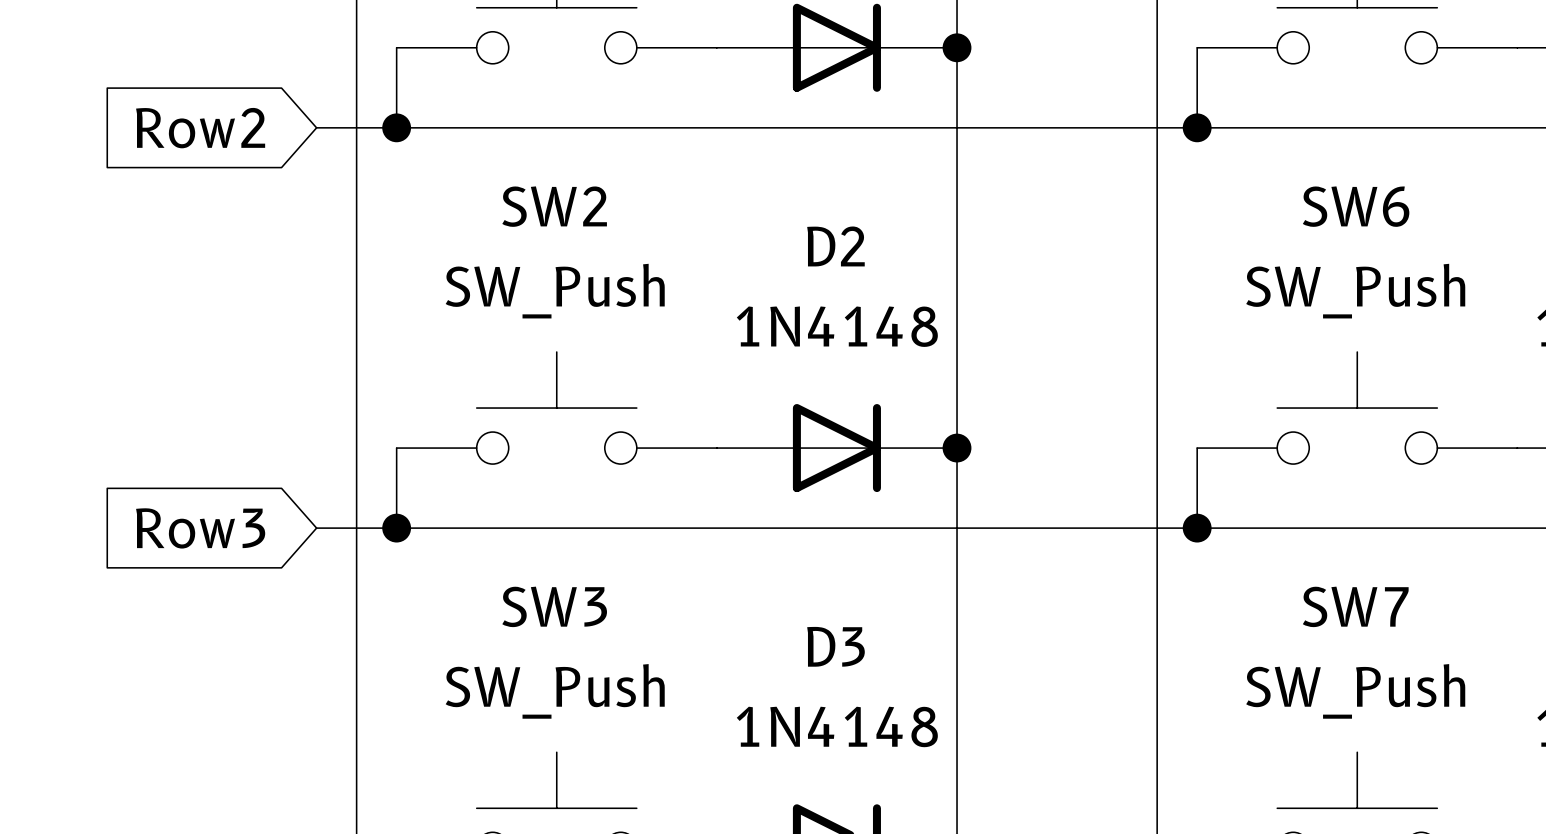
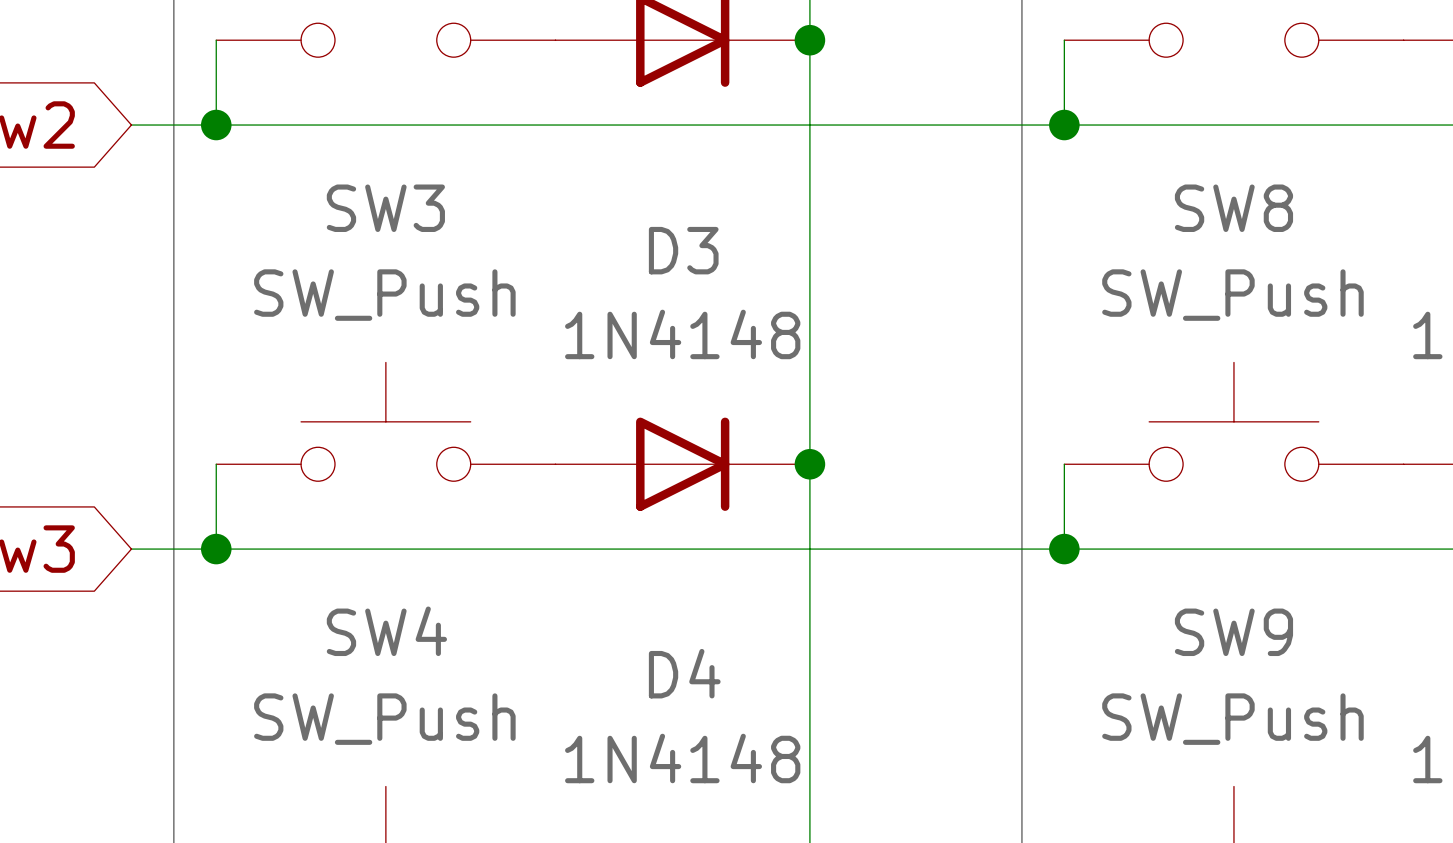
SW2 name: SW2 (554, 206) -> SW3 (385, 208)
SW6 name: SW6 (1356, 206) -> SW8 (1233, 208)
D2 name: D2 (835, 246) -> D3 (683, 250)
SW3 name: SW3 (554, 606) -> SW4 (386, 631)
SW7 name: SW7 (1355, 606) -> SW9 (1233, 632)
D3 name: D3 (835, 646) -> D4 (684, 673)

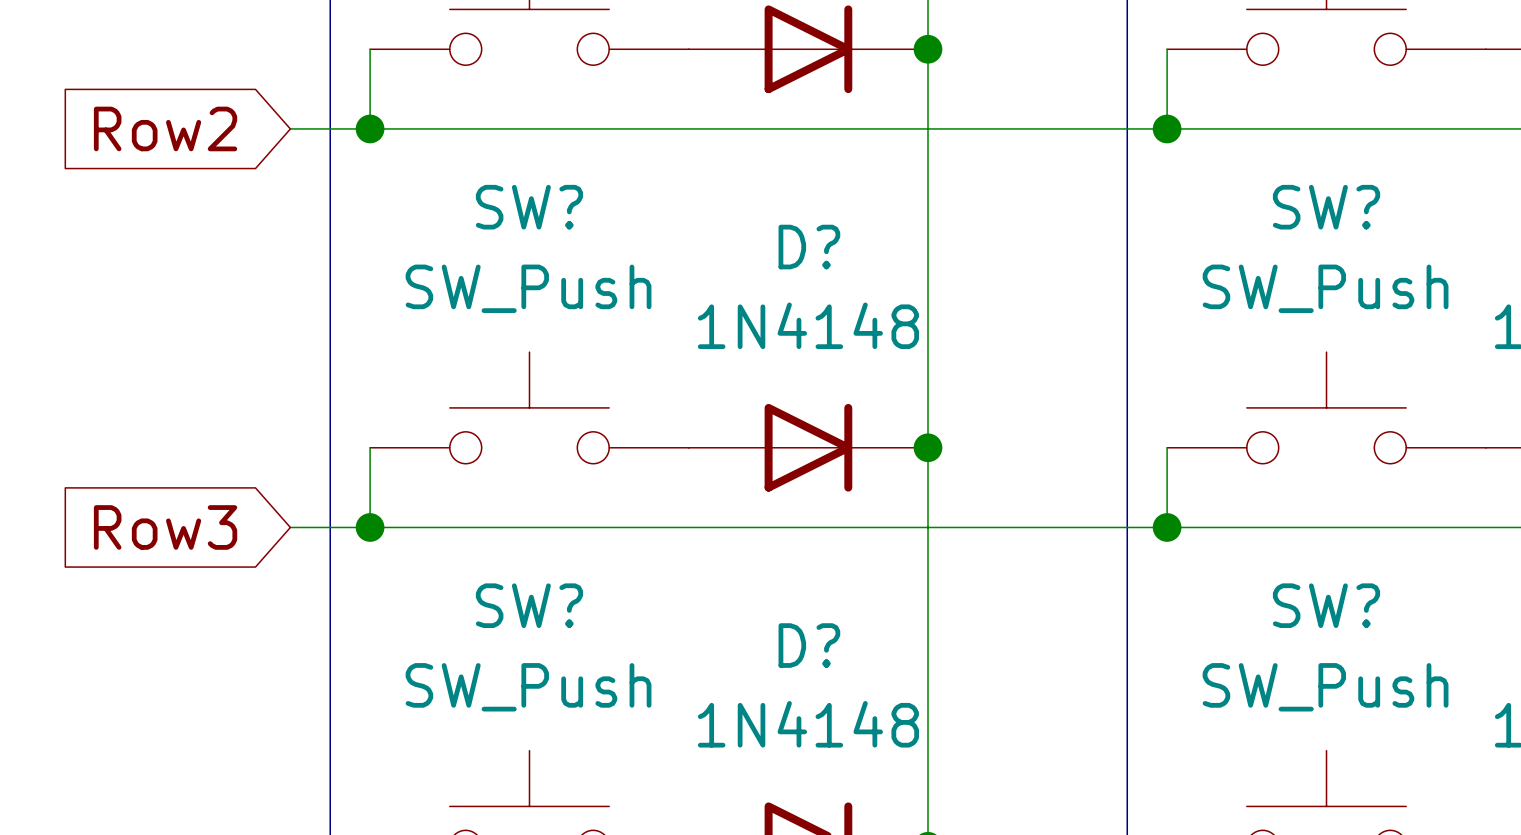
SW3 name: SW3 (385, 208) -> SW? (529, 207)
SW8 name: SW8 (1233, 208) -> SW? (1326, 207)
D3 name: D3 (683, 250) -> D? (809, 247)
SW4 name: SW4 (386, 631) -> SW? (529, 605)
SW9 name: SW9 (1233, 632) -> SW? (1326, 605)
D4 name: D4 (684, 673) -> D? (809, 645)

